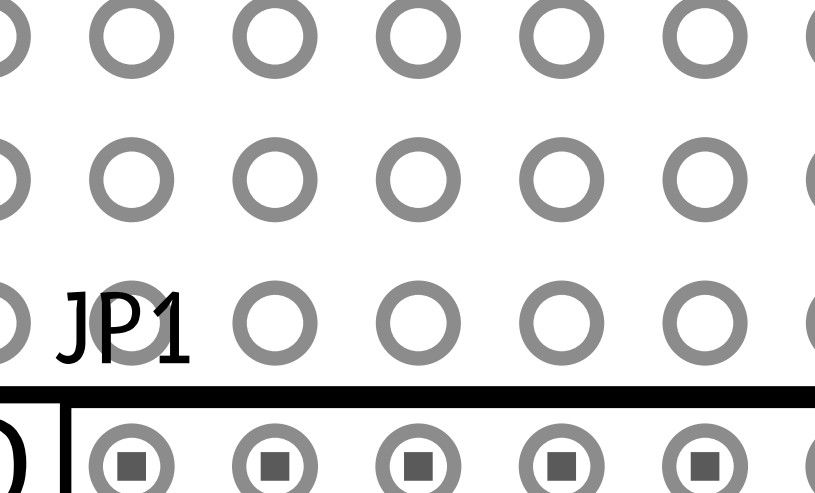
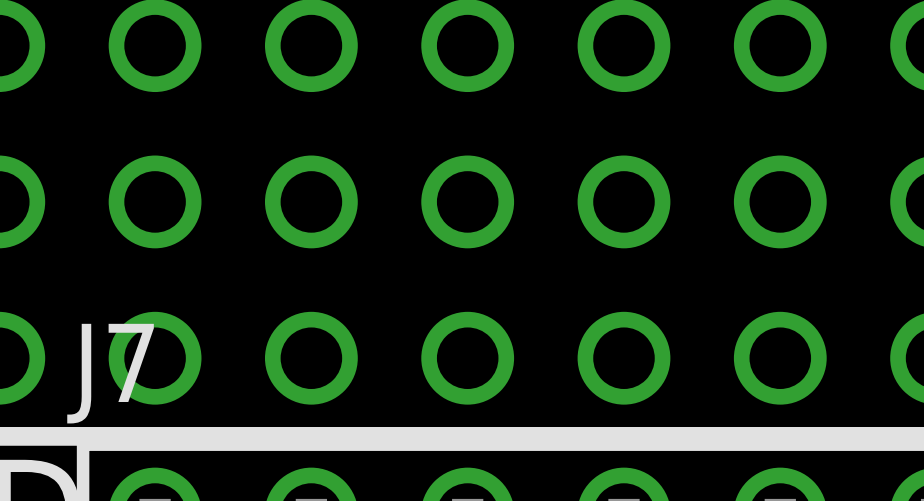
JP1 name: JP1 (122, 327) -> J7 (110, 373)

